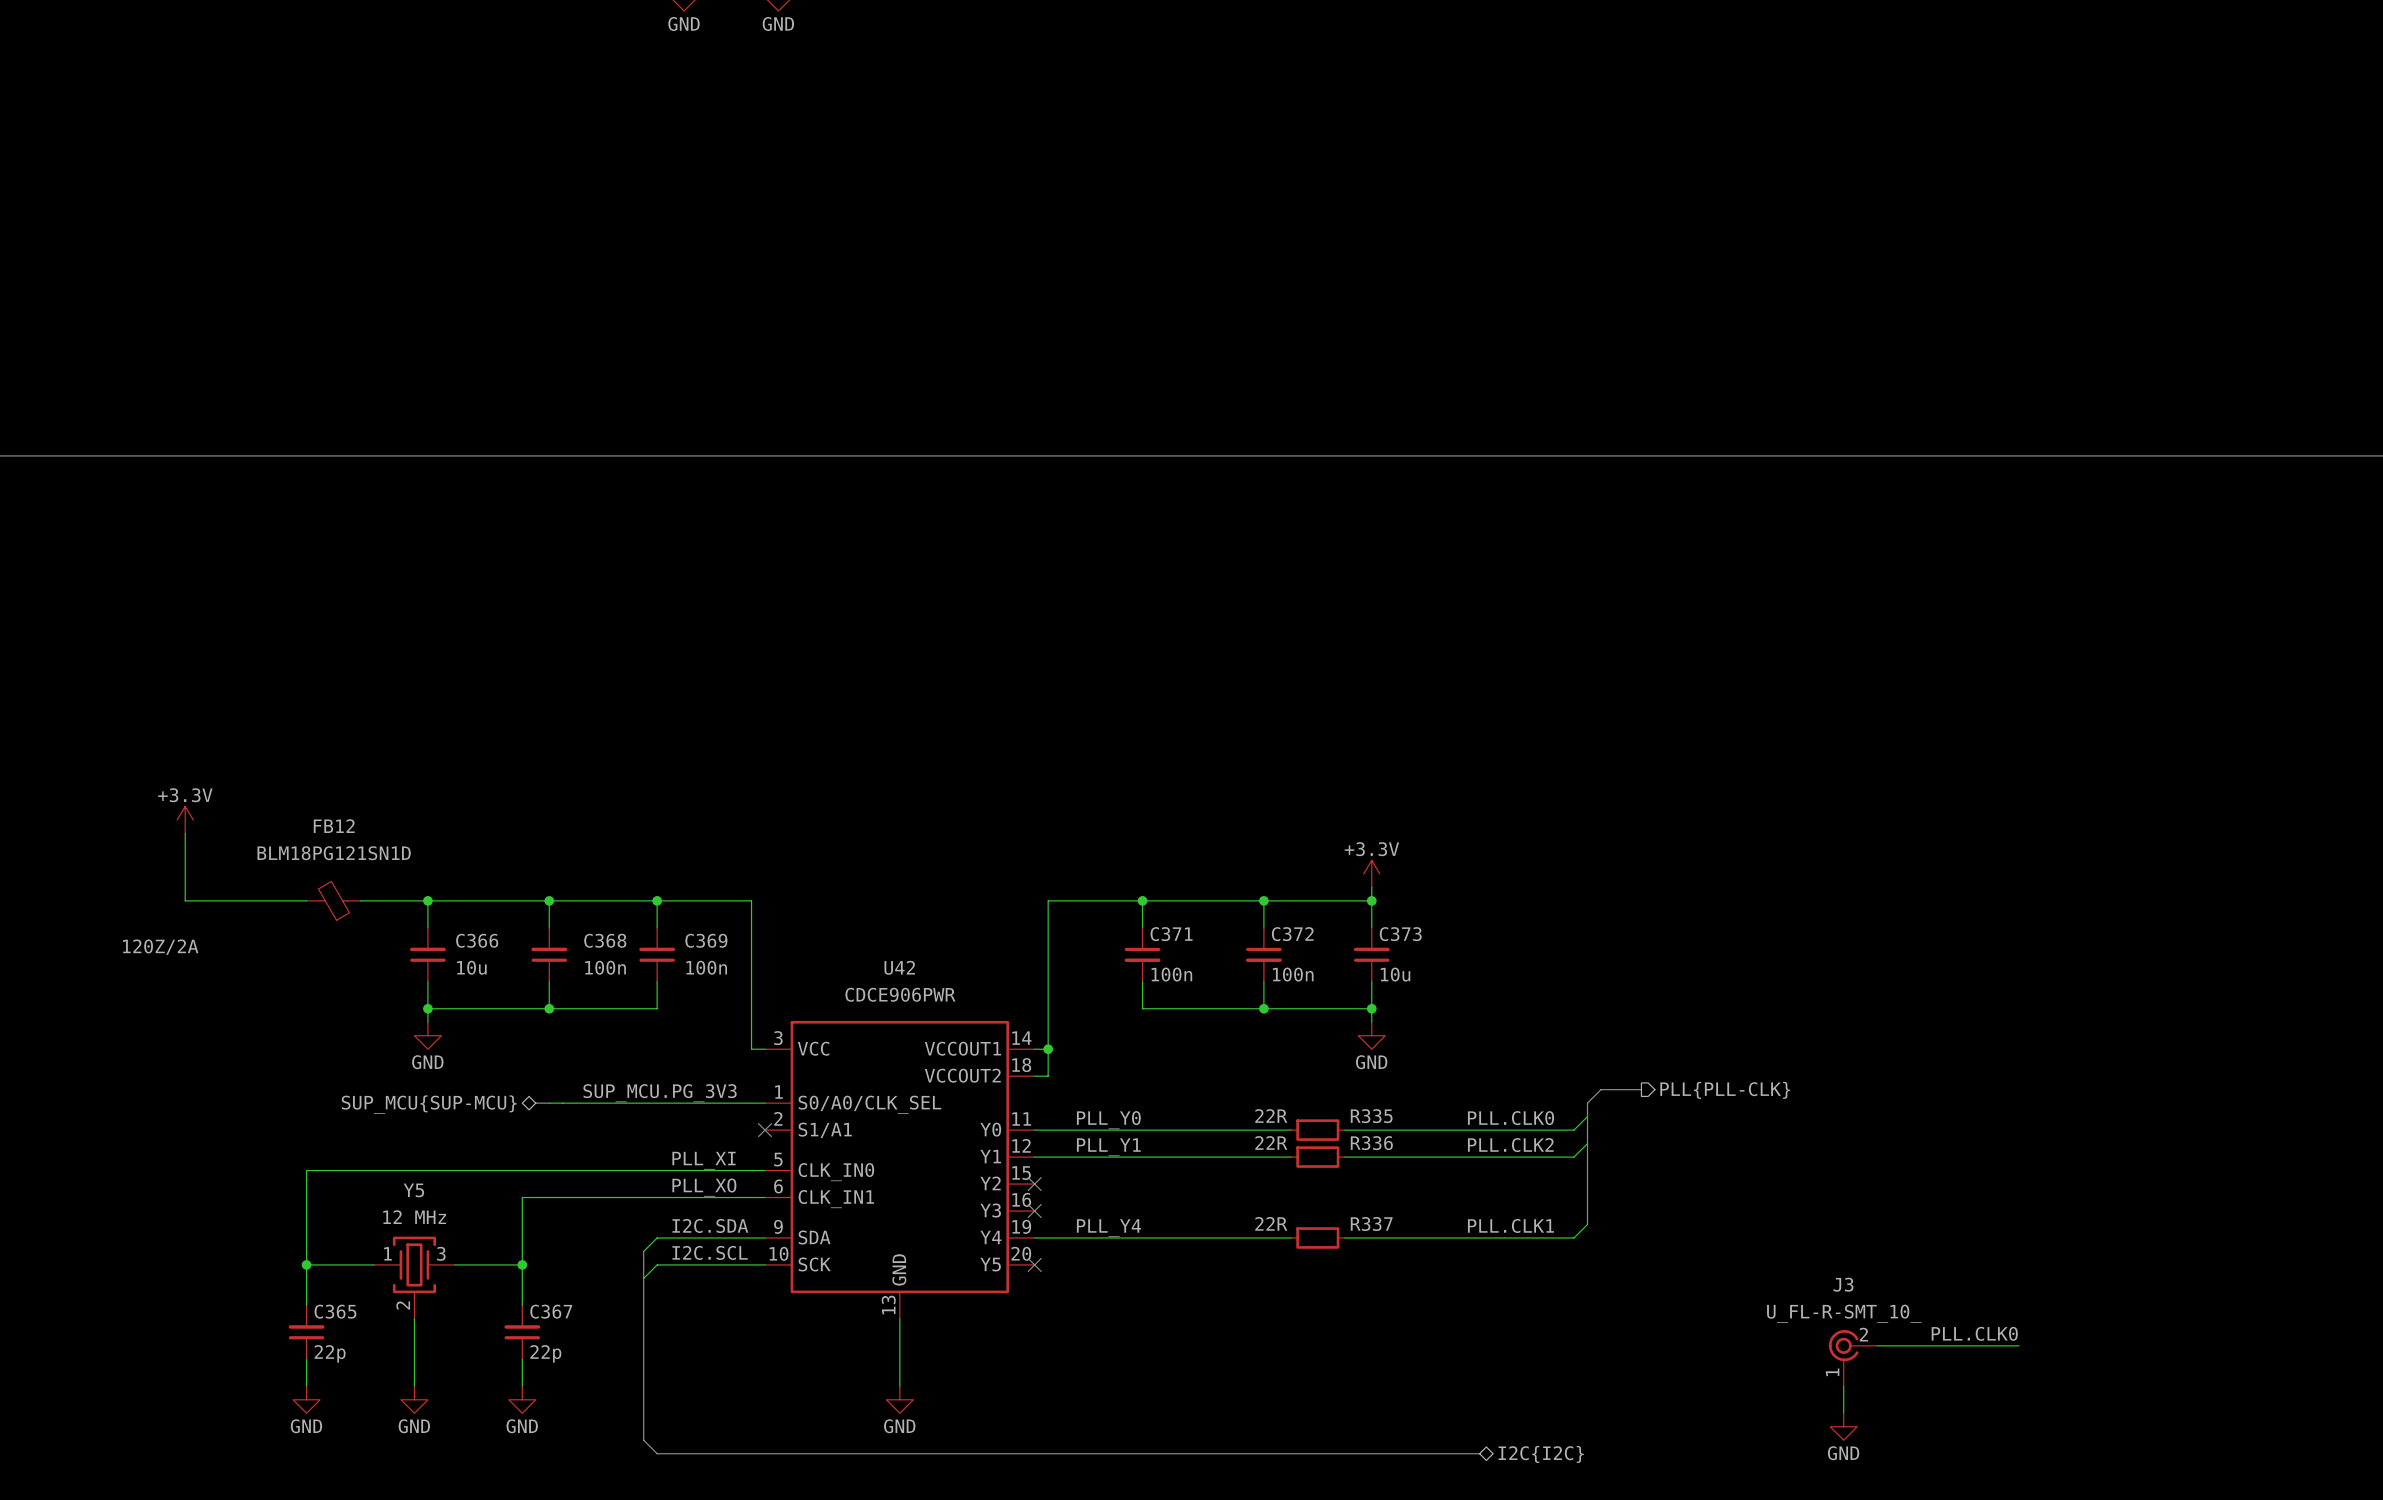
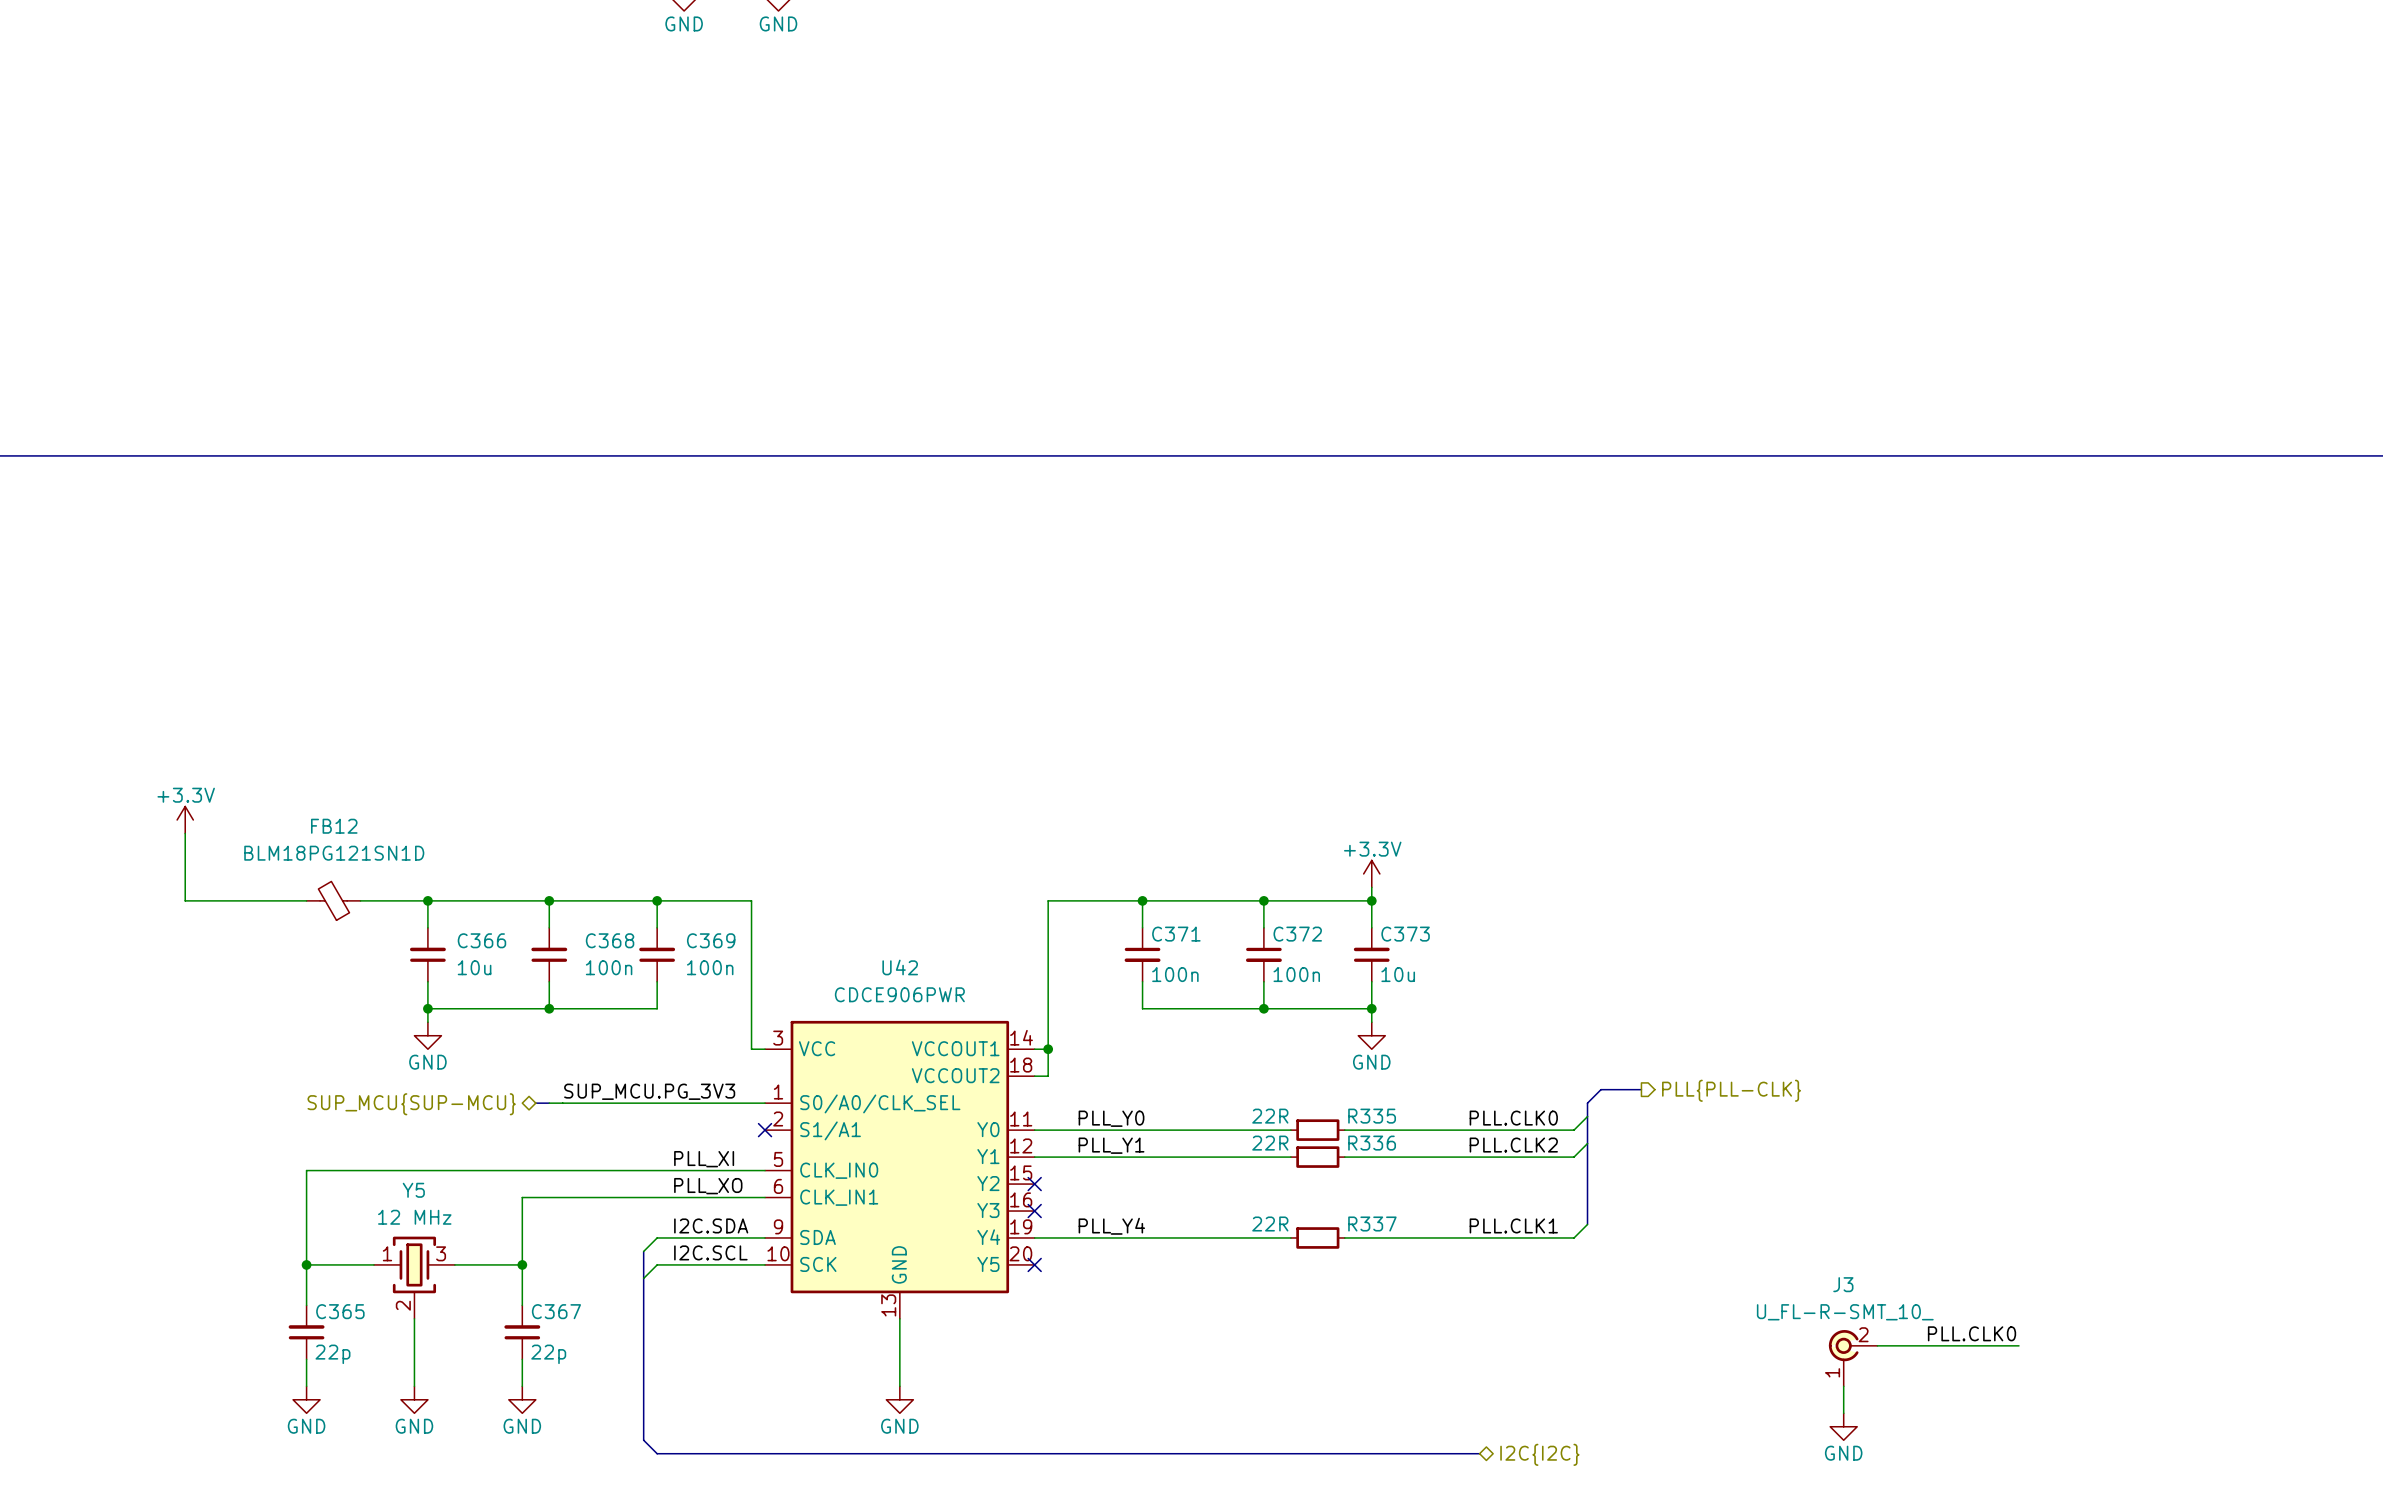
FB12 text: 120Z/2A (160, 947) -> none

